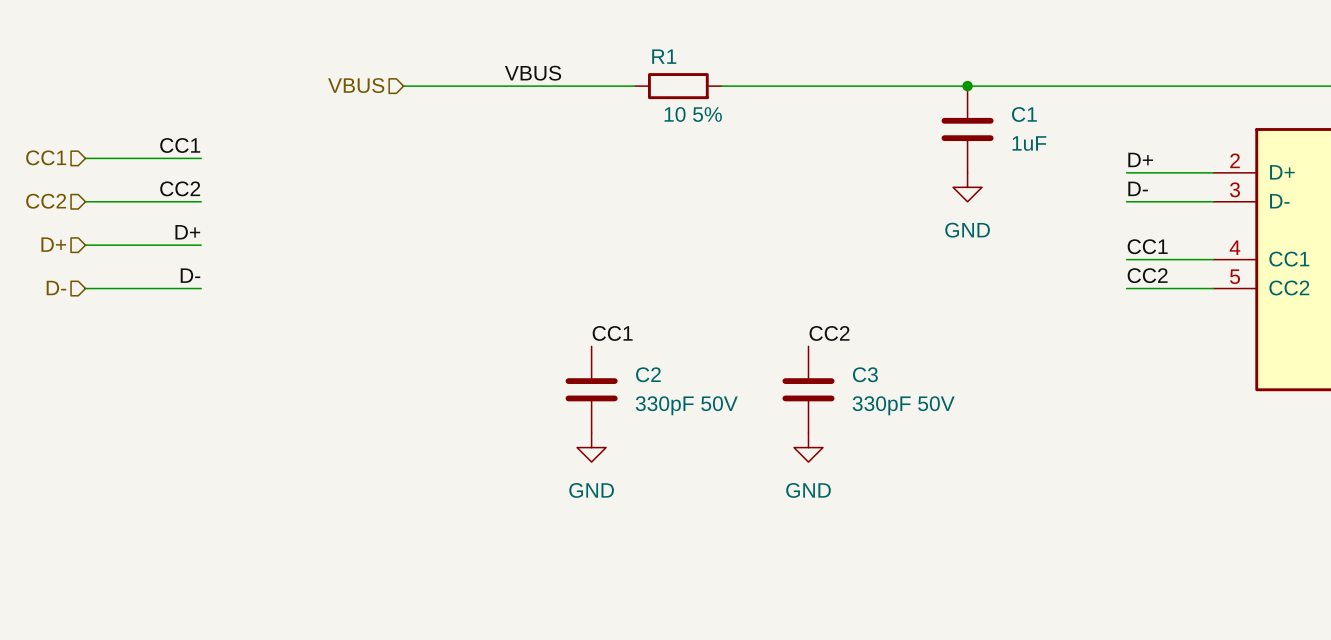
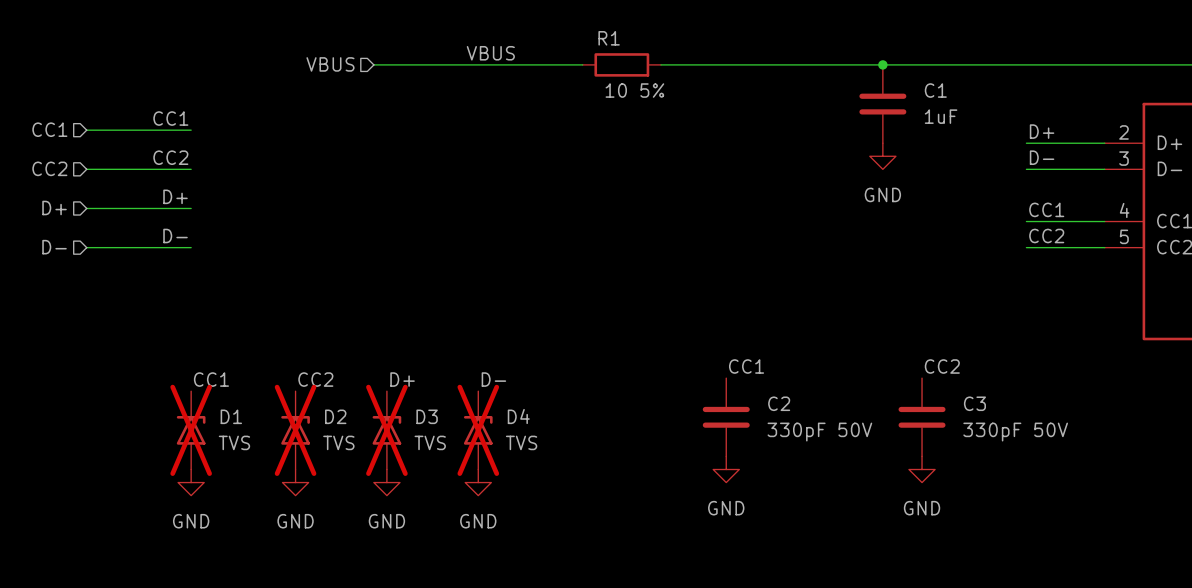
label: CC1 (612, 333) -> none
label position: CC2 (829, 333) -> CC2 (942, 366)
C2 position: (591, 389) -> (726, 417)
C3 position: (808, 389) -> (922, 417)
label: none -> CC1 (746, 366)
label: none -> CC1 (211, 379)
label: none -> CC2 (315, 379)
label: none -> D+ (402, 379)
label: none -> D- (493, 379)
power symbol: GND (591, 447) -> none
power symbol position: GND (808, 447) -> GND (726, 469)
D1: none -> TVS (191, 430)
D2: none -> TVS (295, 430)
D3: none -> TVS (386, 430)
D4: none -> TVS (478, 430)
power symbol: none -> GND (922, 469)
power symbol: none -> GND (191, 482)
power symbol: none -> GND (295, 482)
power symbol: none -> GND (386, 482)
power symbol: none -> GND (478, 482)

